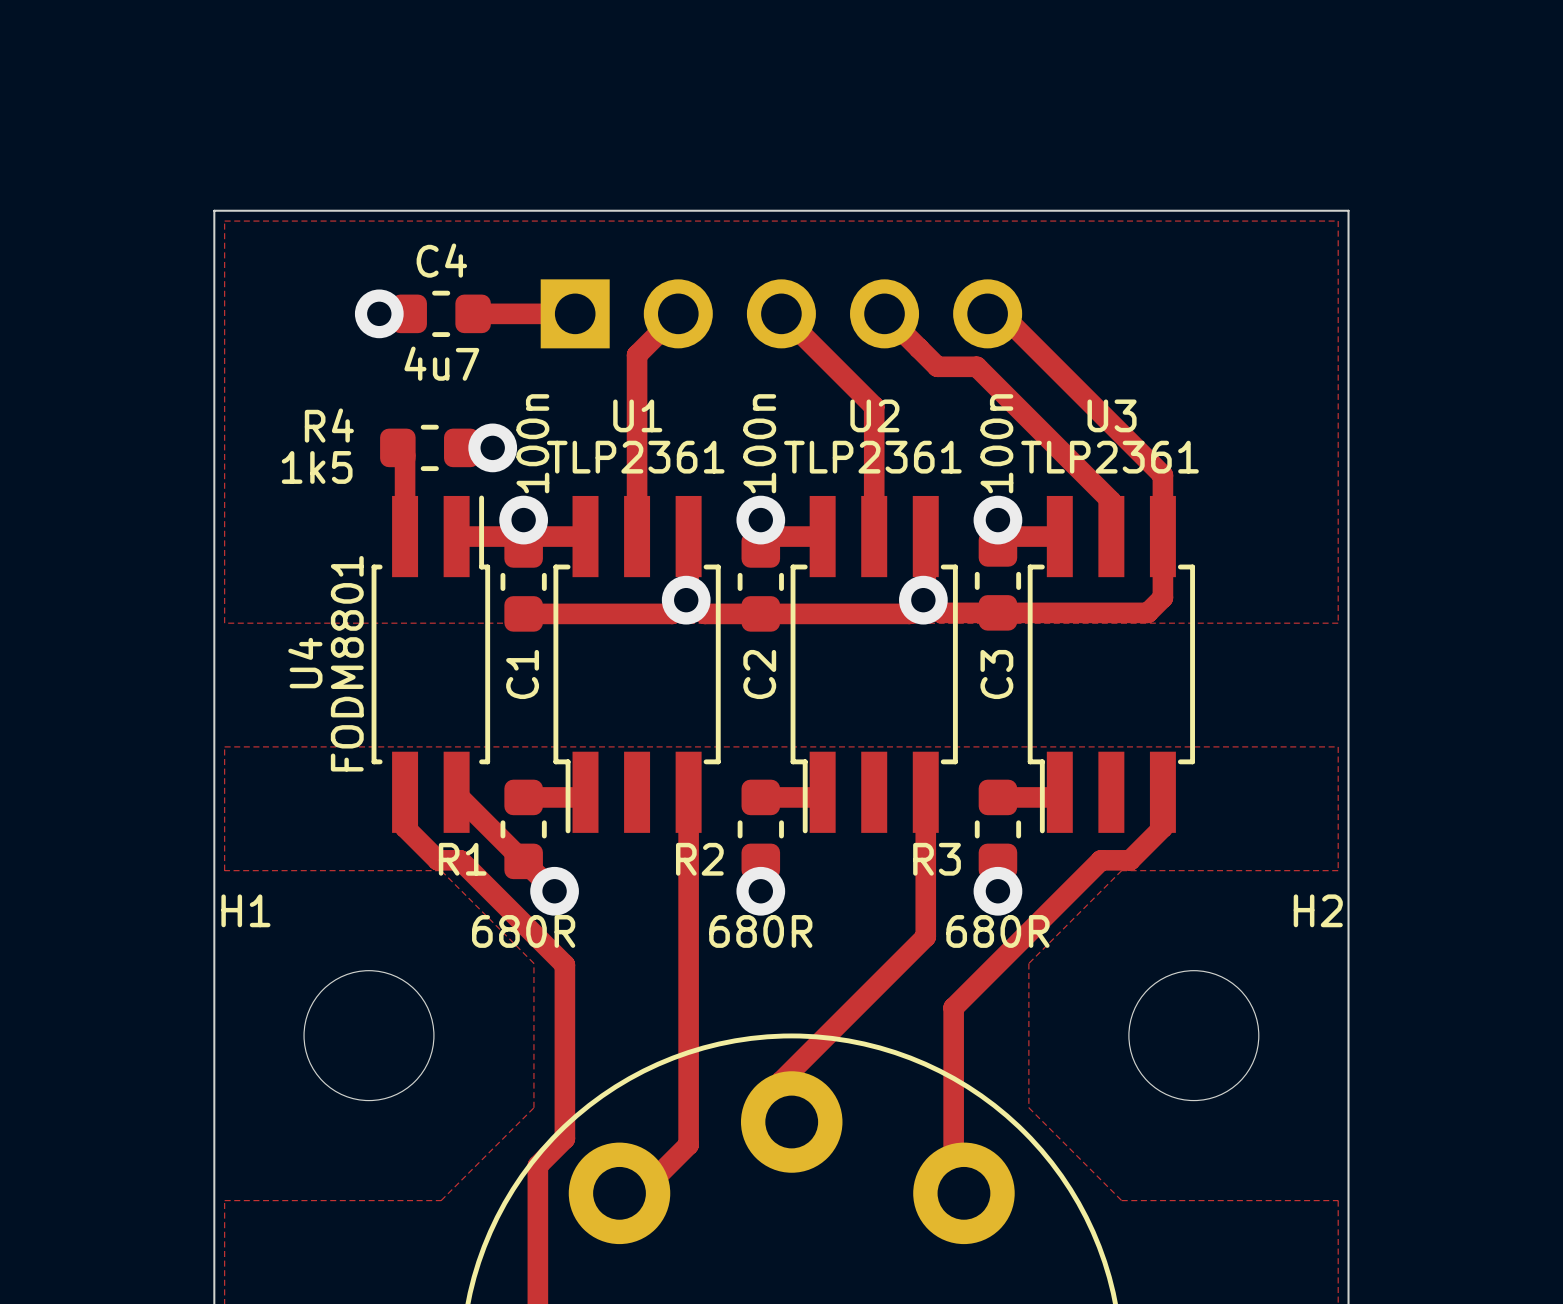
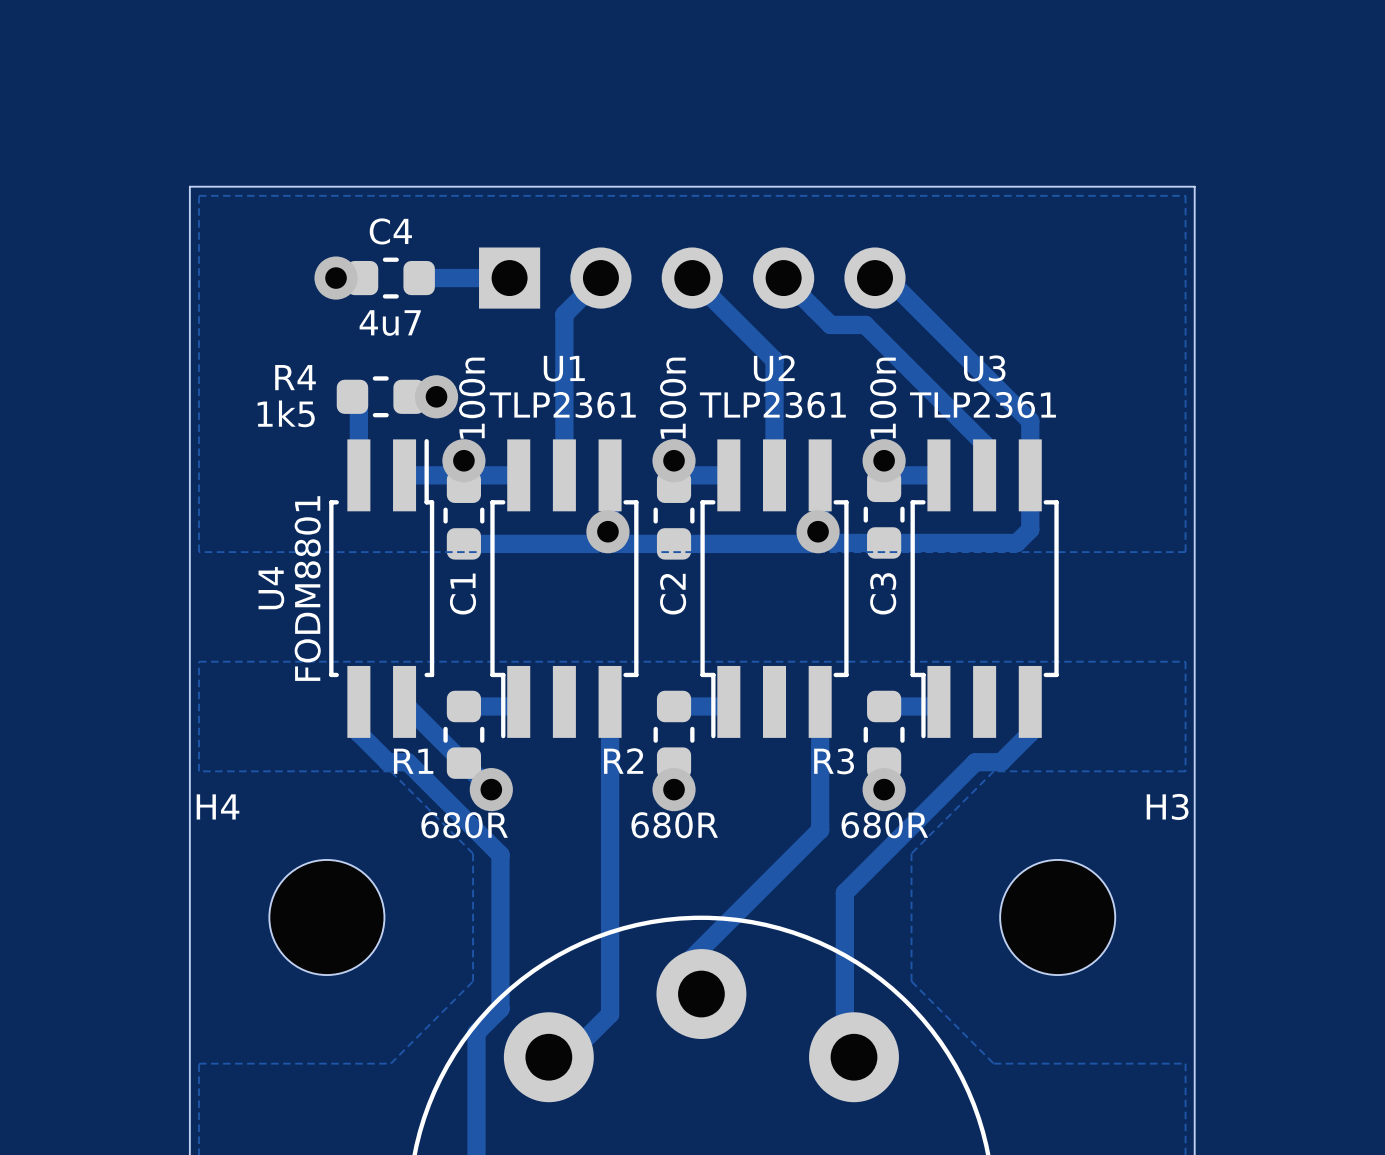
H1 name: H1 (245, 910) -> H4 (218, 806)
H2 name: H2 (1318, 910) -> H3 (1167, 806)

